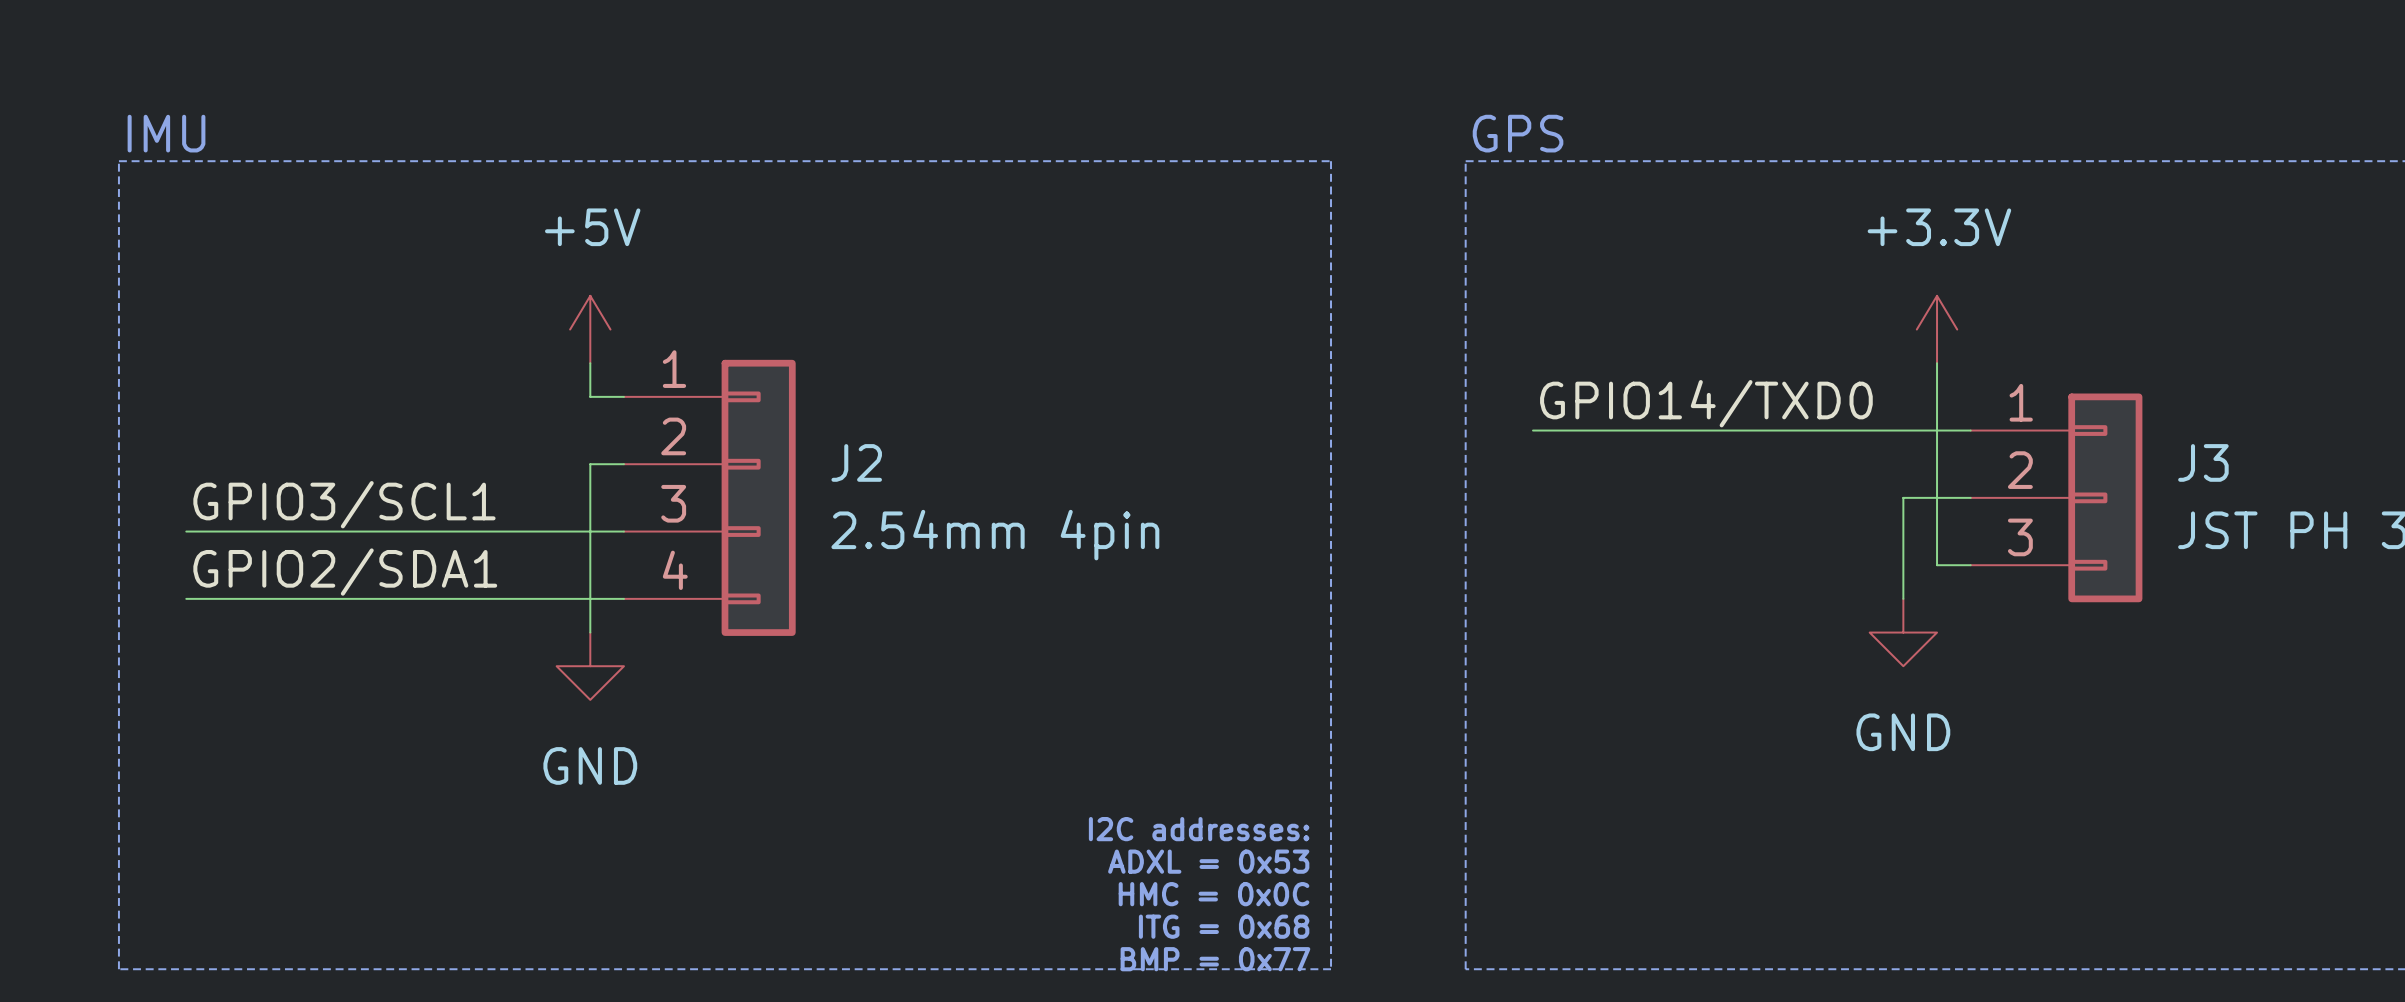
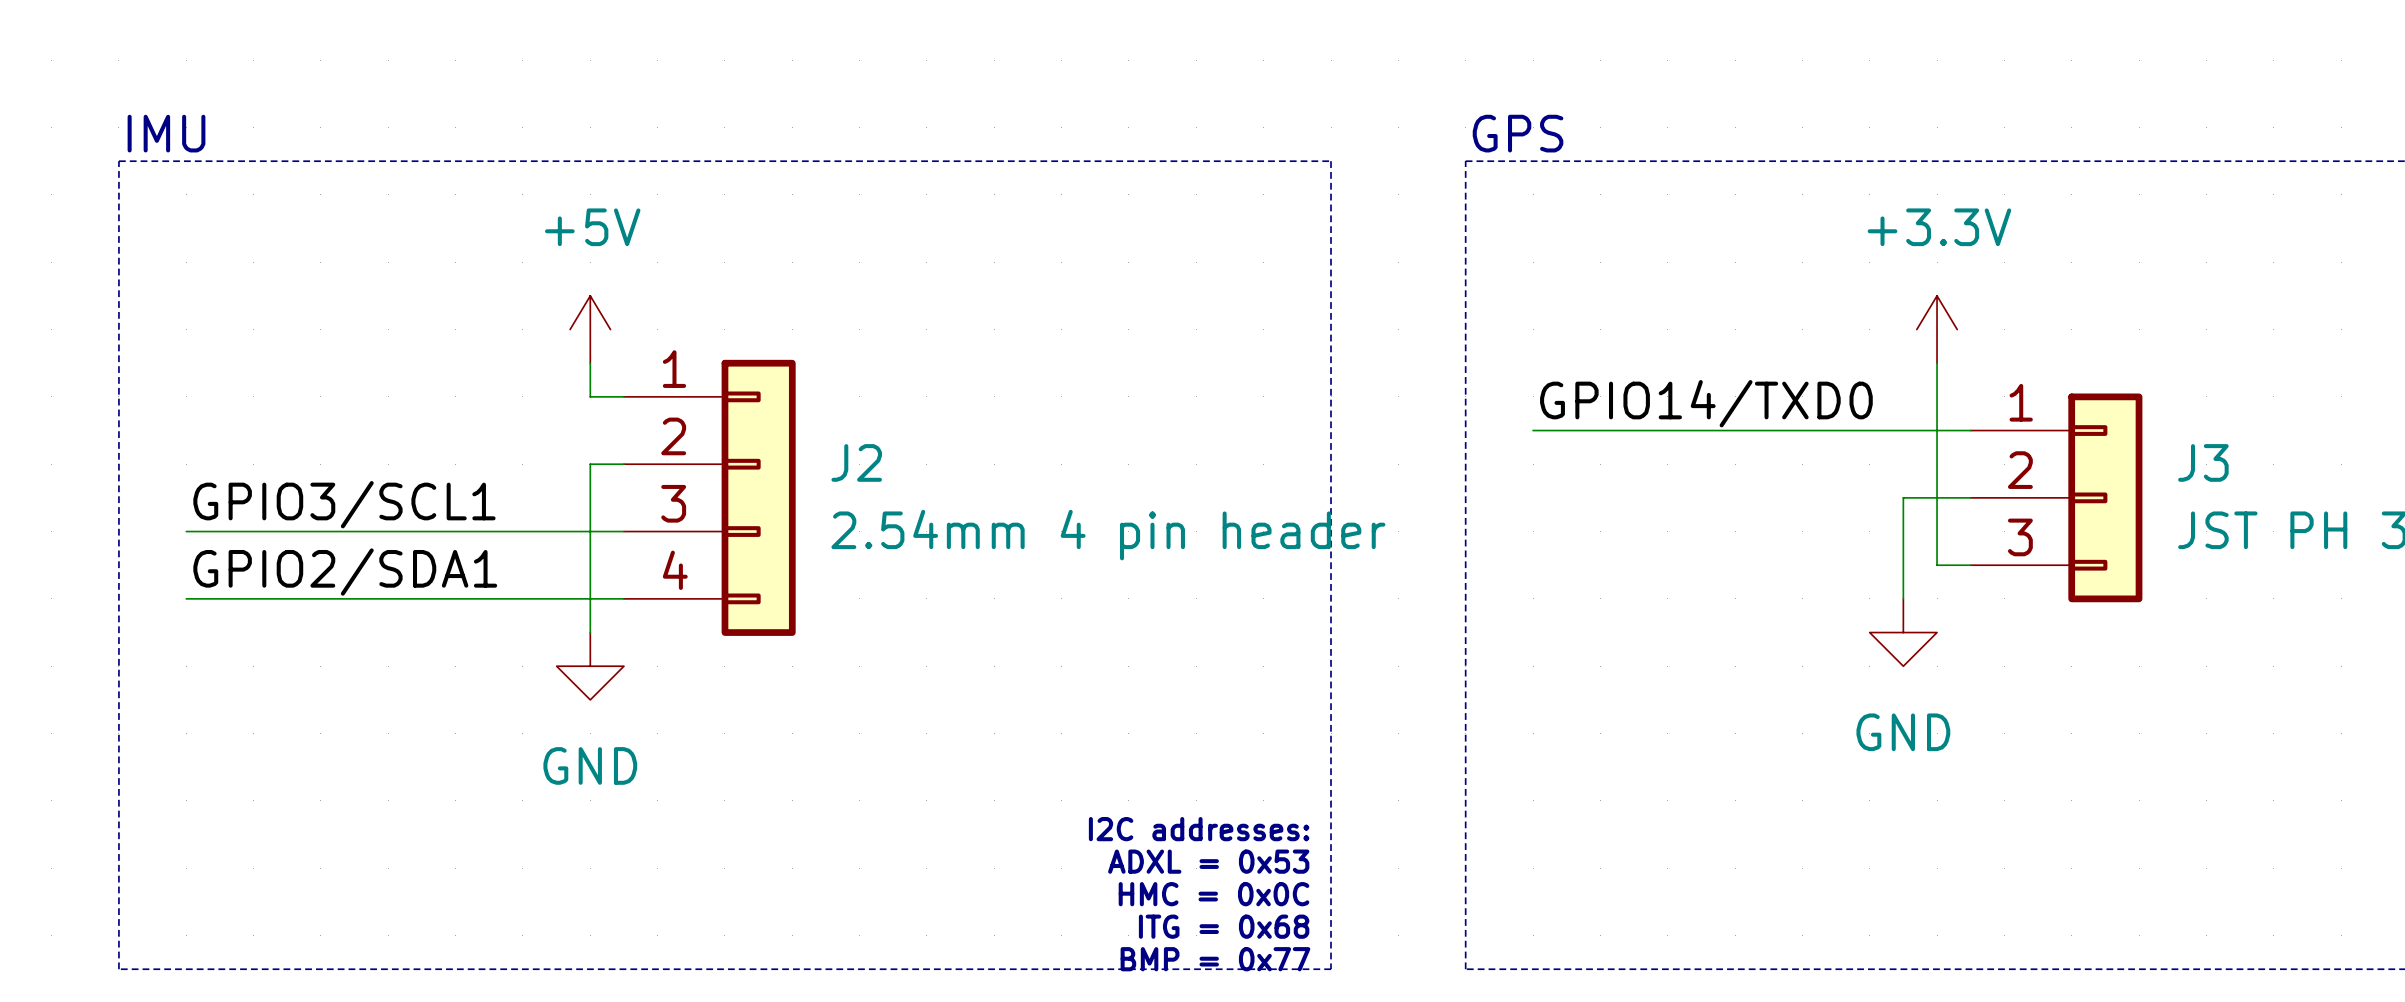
J2 value: 2.54mm 4pin (995, 535) -> 2.54mm 4 pin header (1108, 535)

